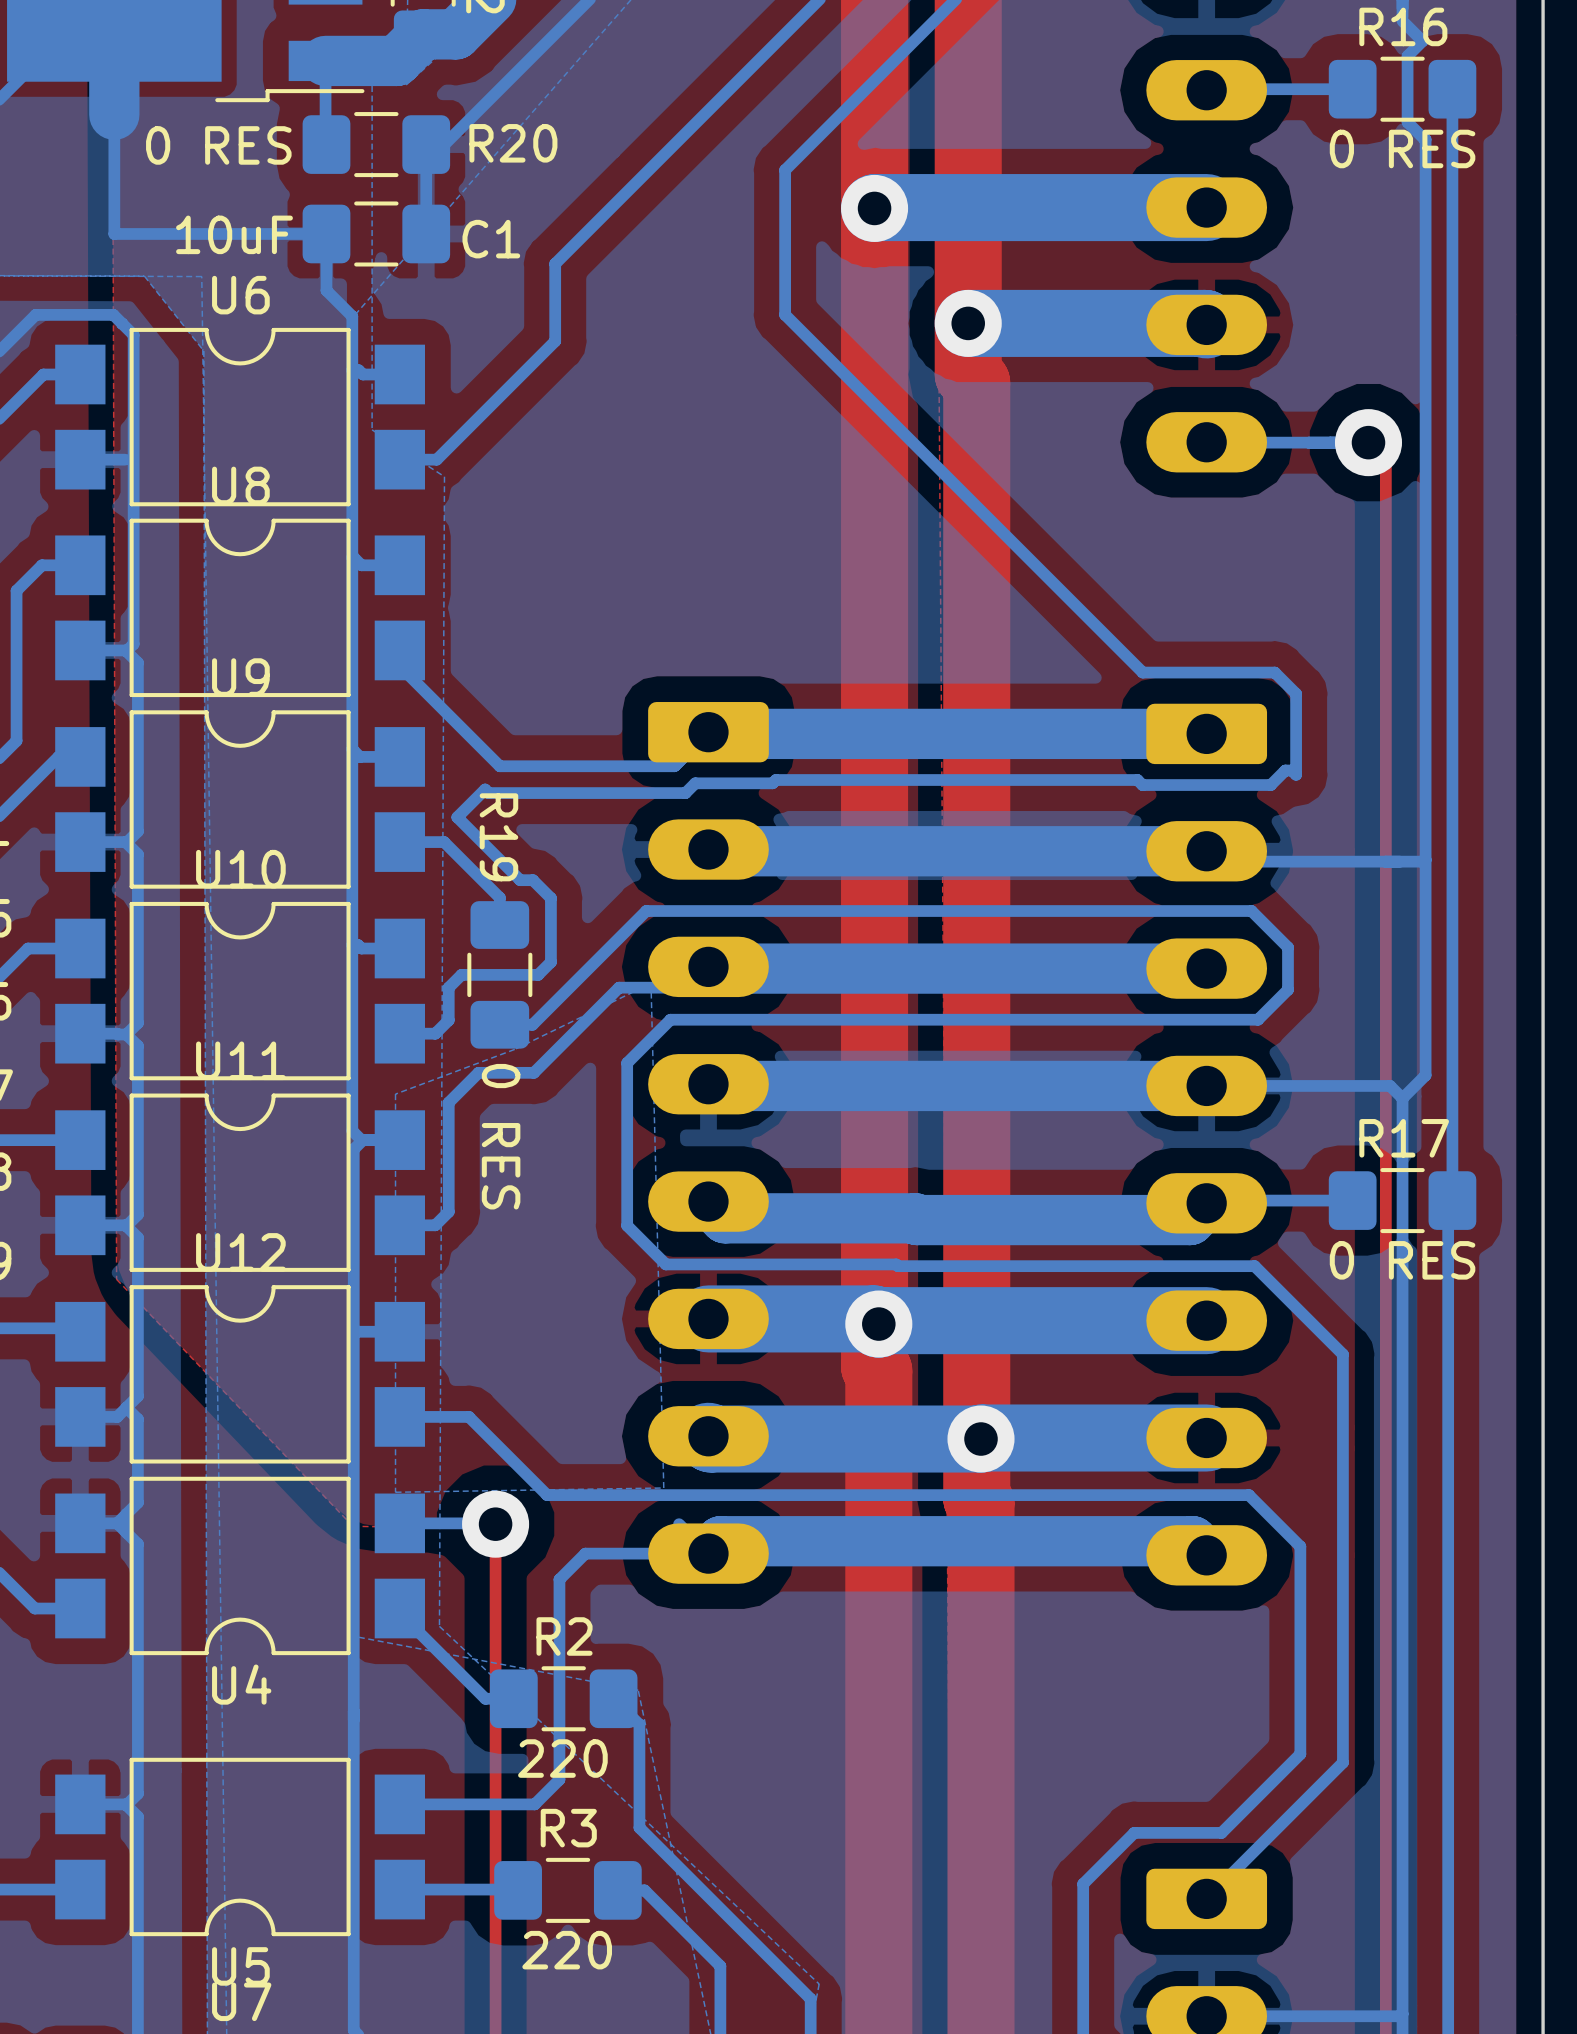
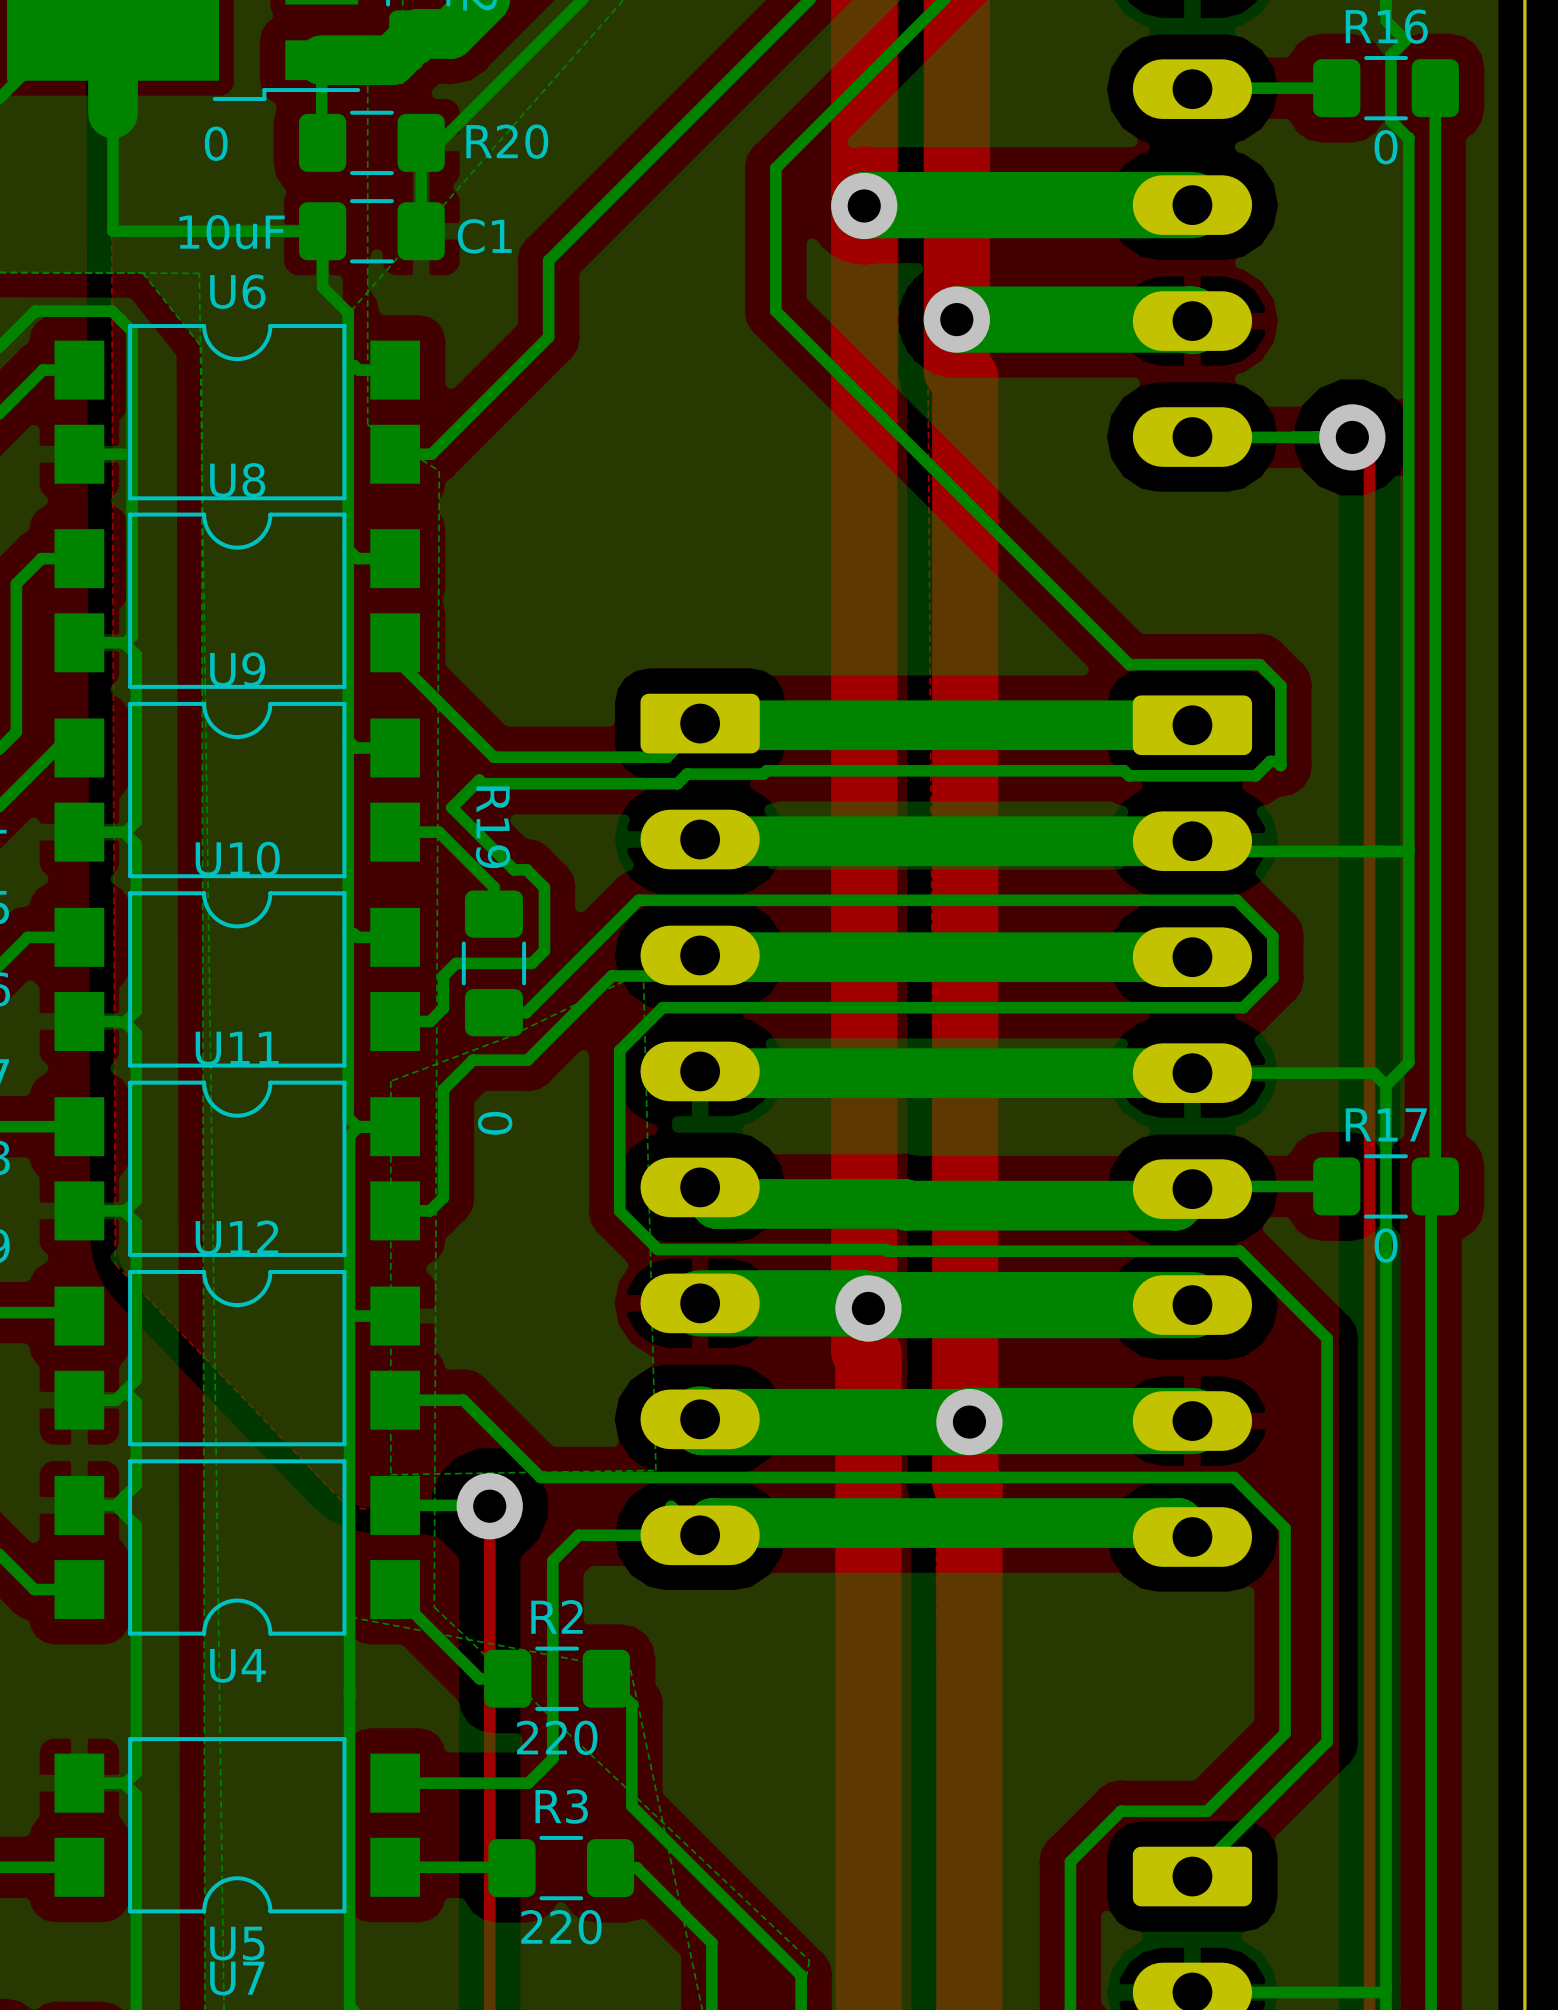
R20 value: 0 RES (218, 145) -> 0 (216, 143)
R16 value: 0 RES (1402, 148) -> 0 (1386, 147)
R19 value: 0 RES (501, 1136) -> 0 (495, 1123)
R17 value: 0 RES (1402, 1260) -> 0 (1386, 1245)

